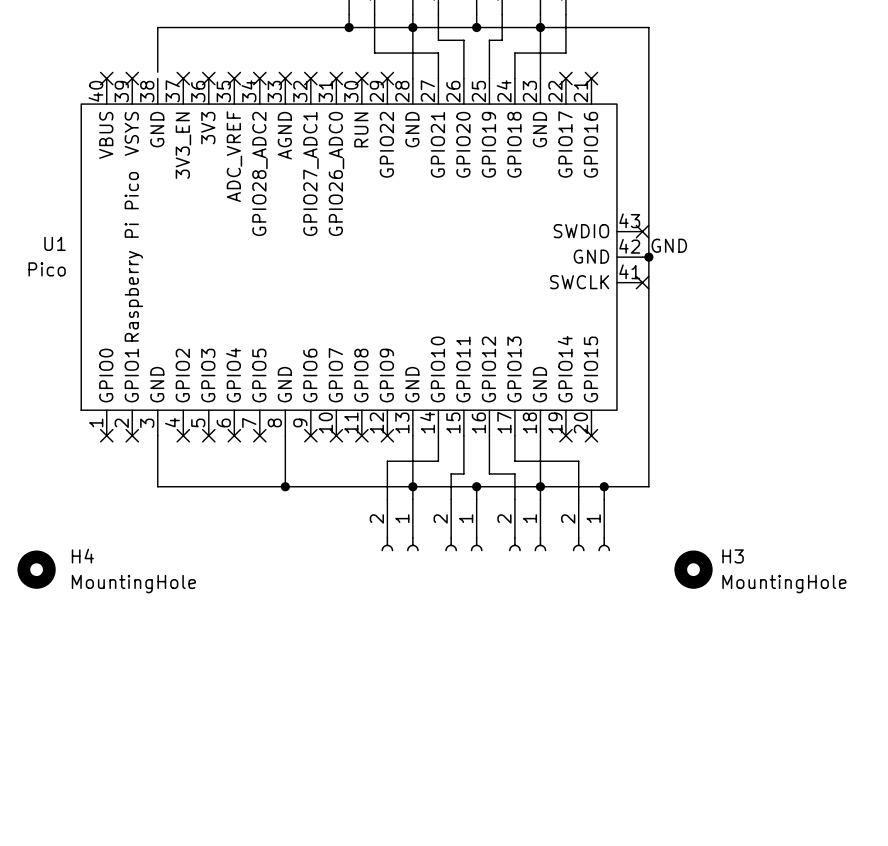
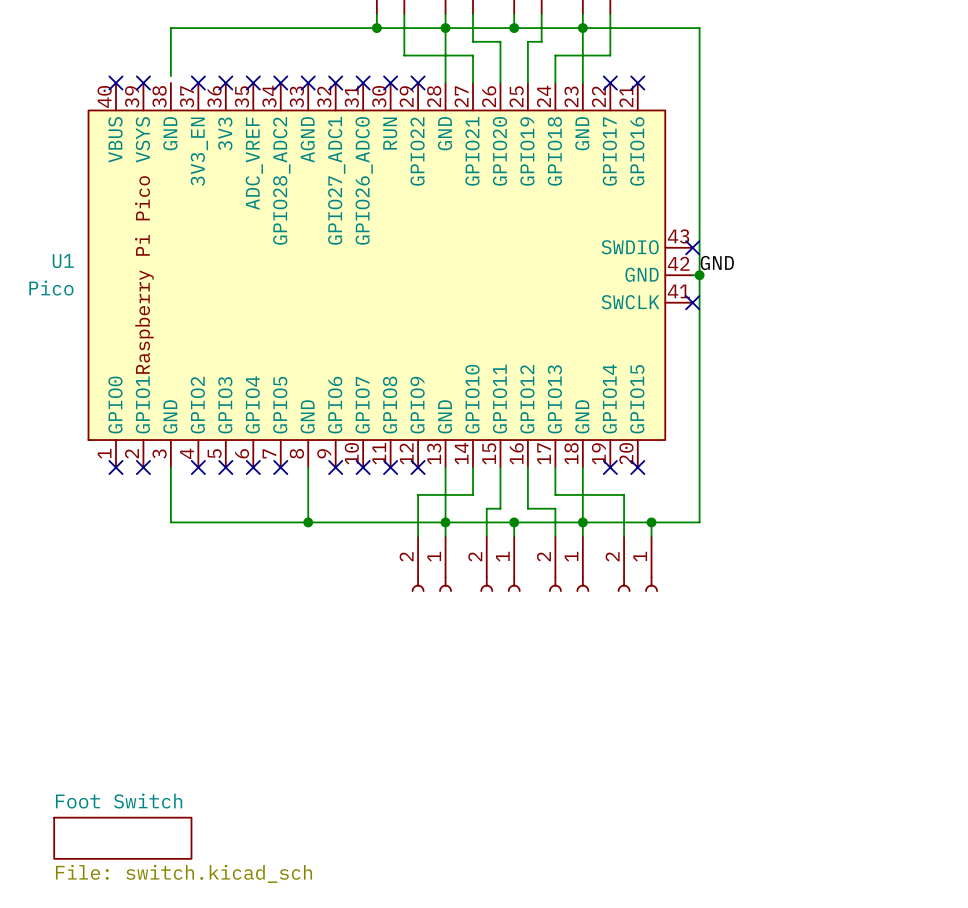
H4: MountingHole (36, 569) -> none
H3: MountingHole (693, 569) -> none
sheet Foot Switch: none -> File: switch.kicad_sch (122, 838)

